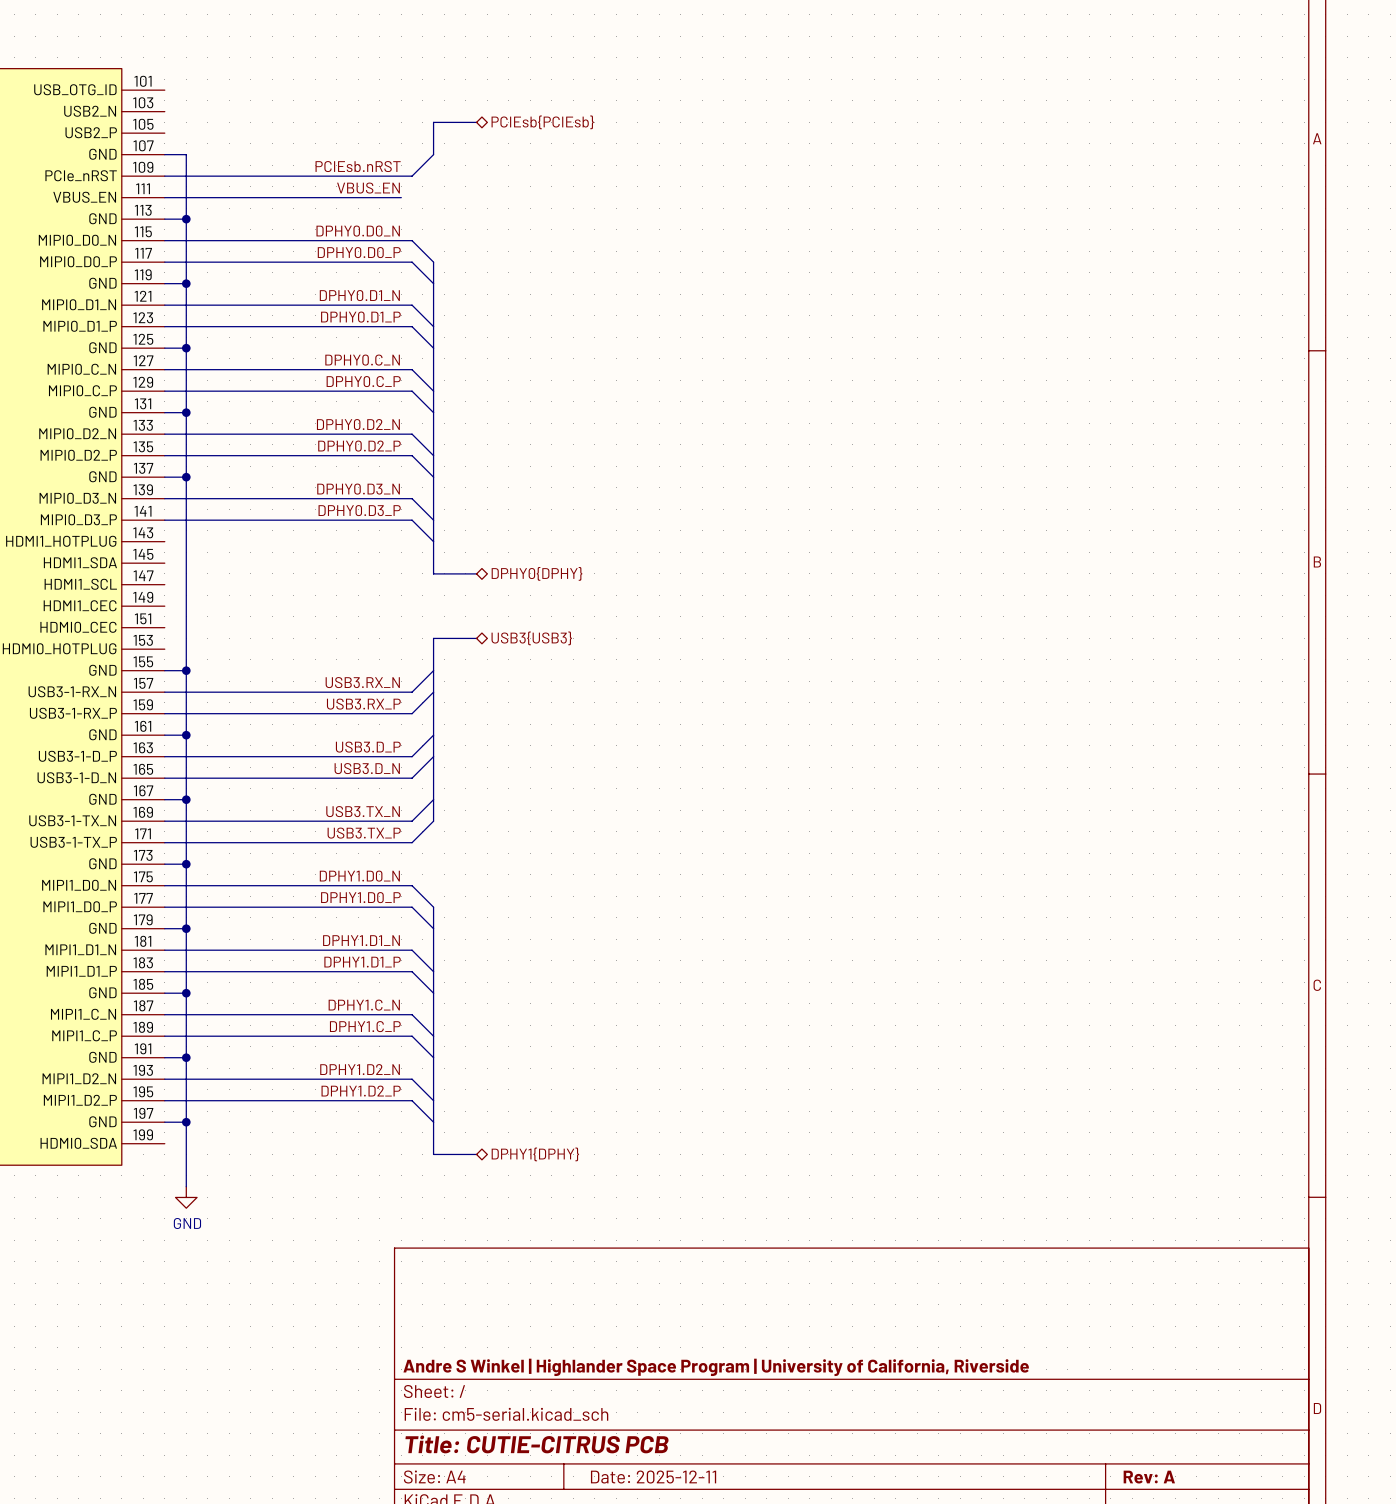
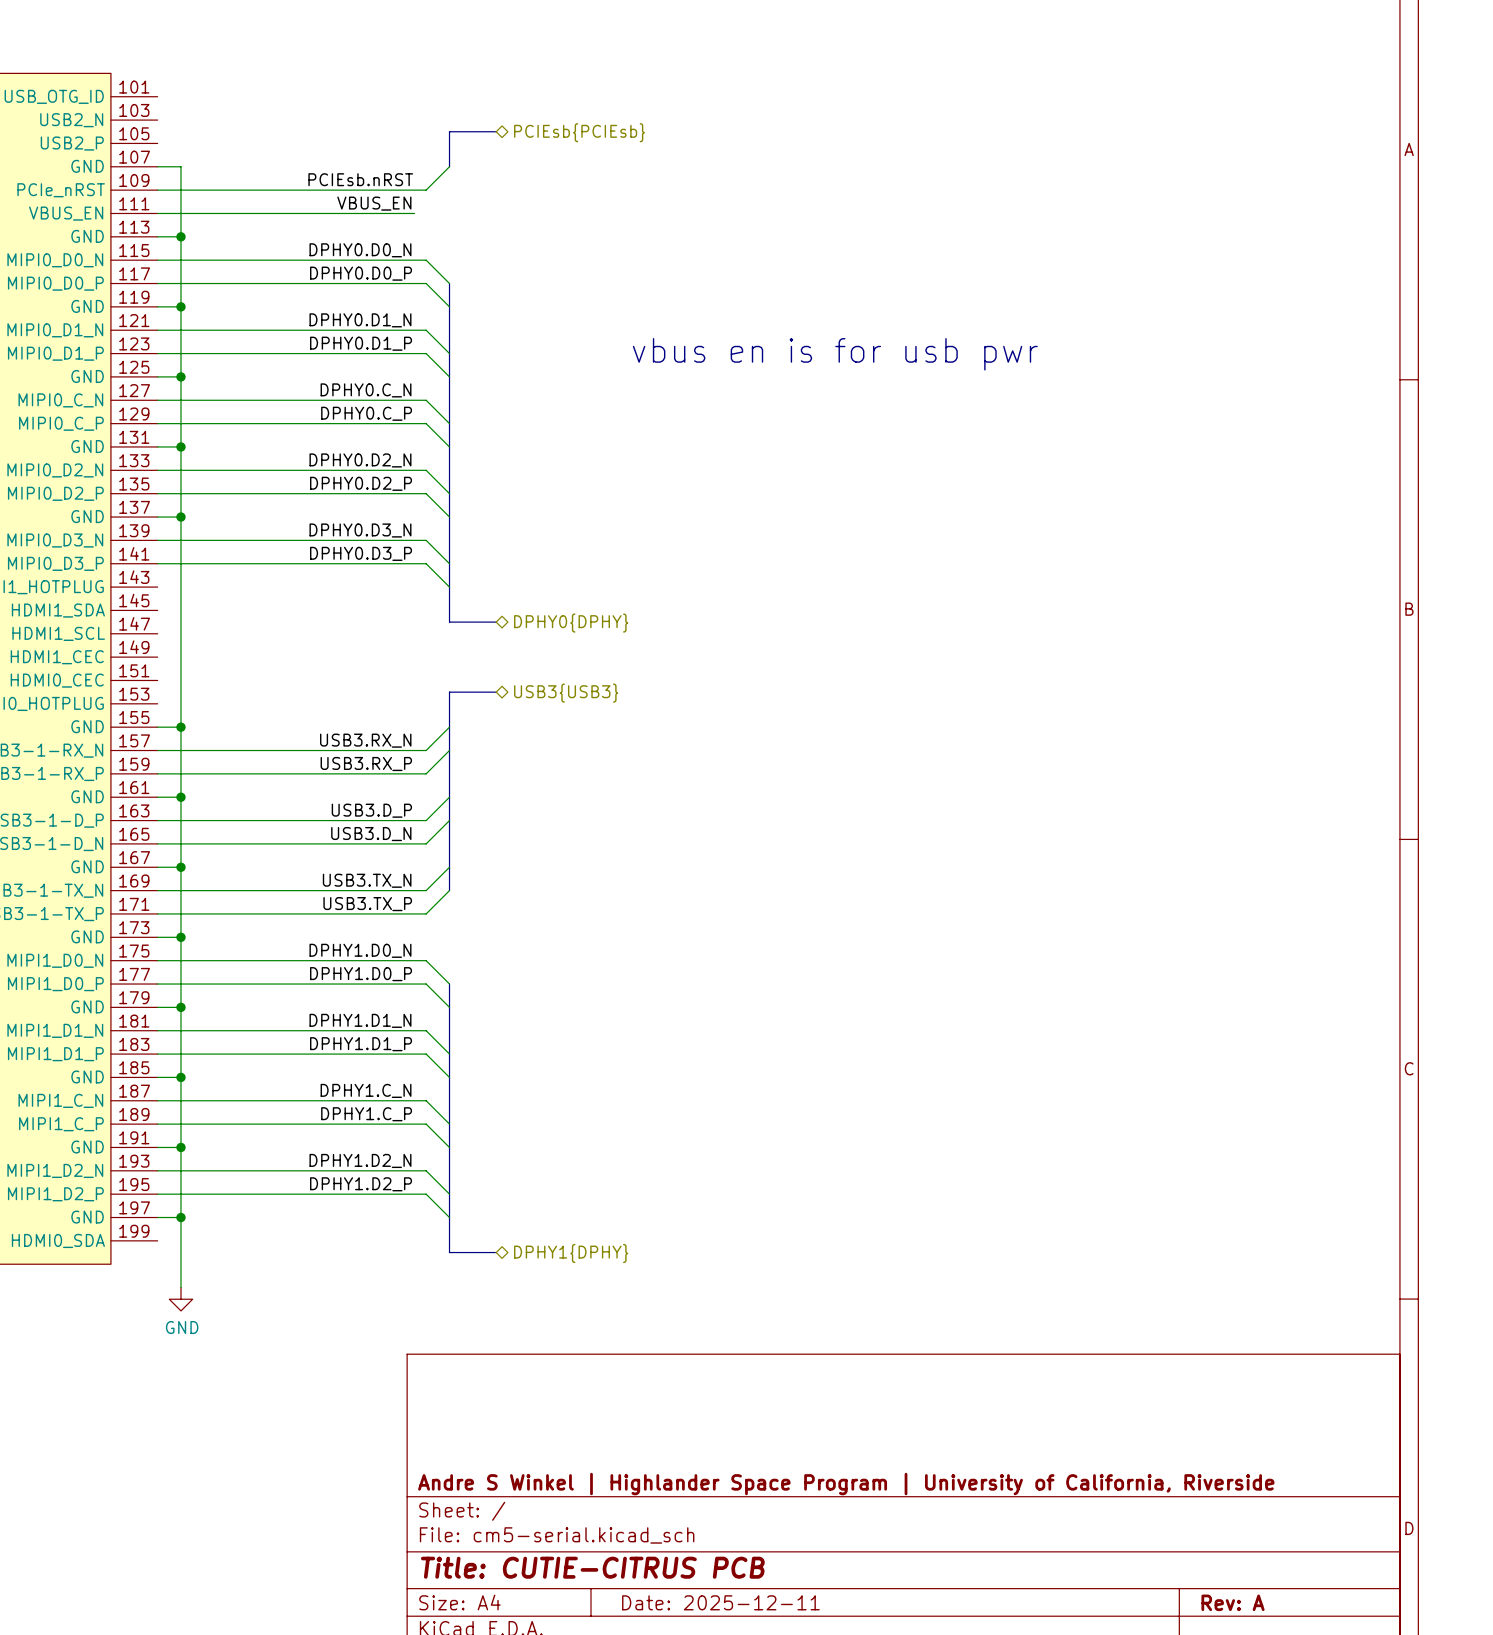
text: none -> vbus en is for usb pwr (835, 354)

